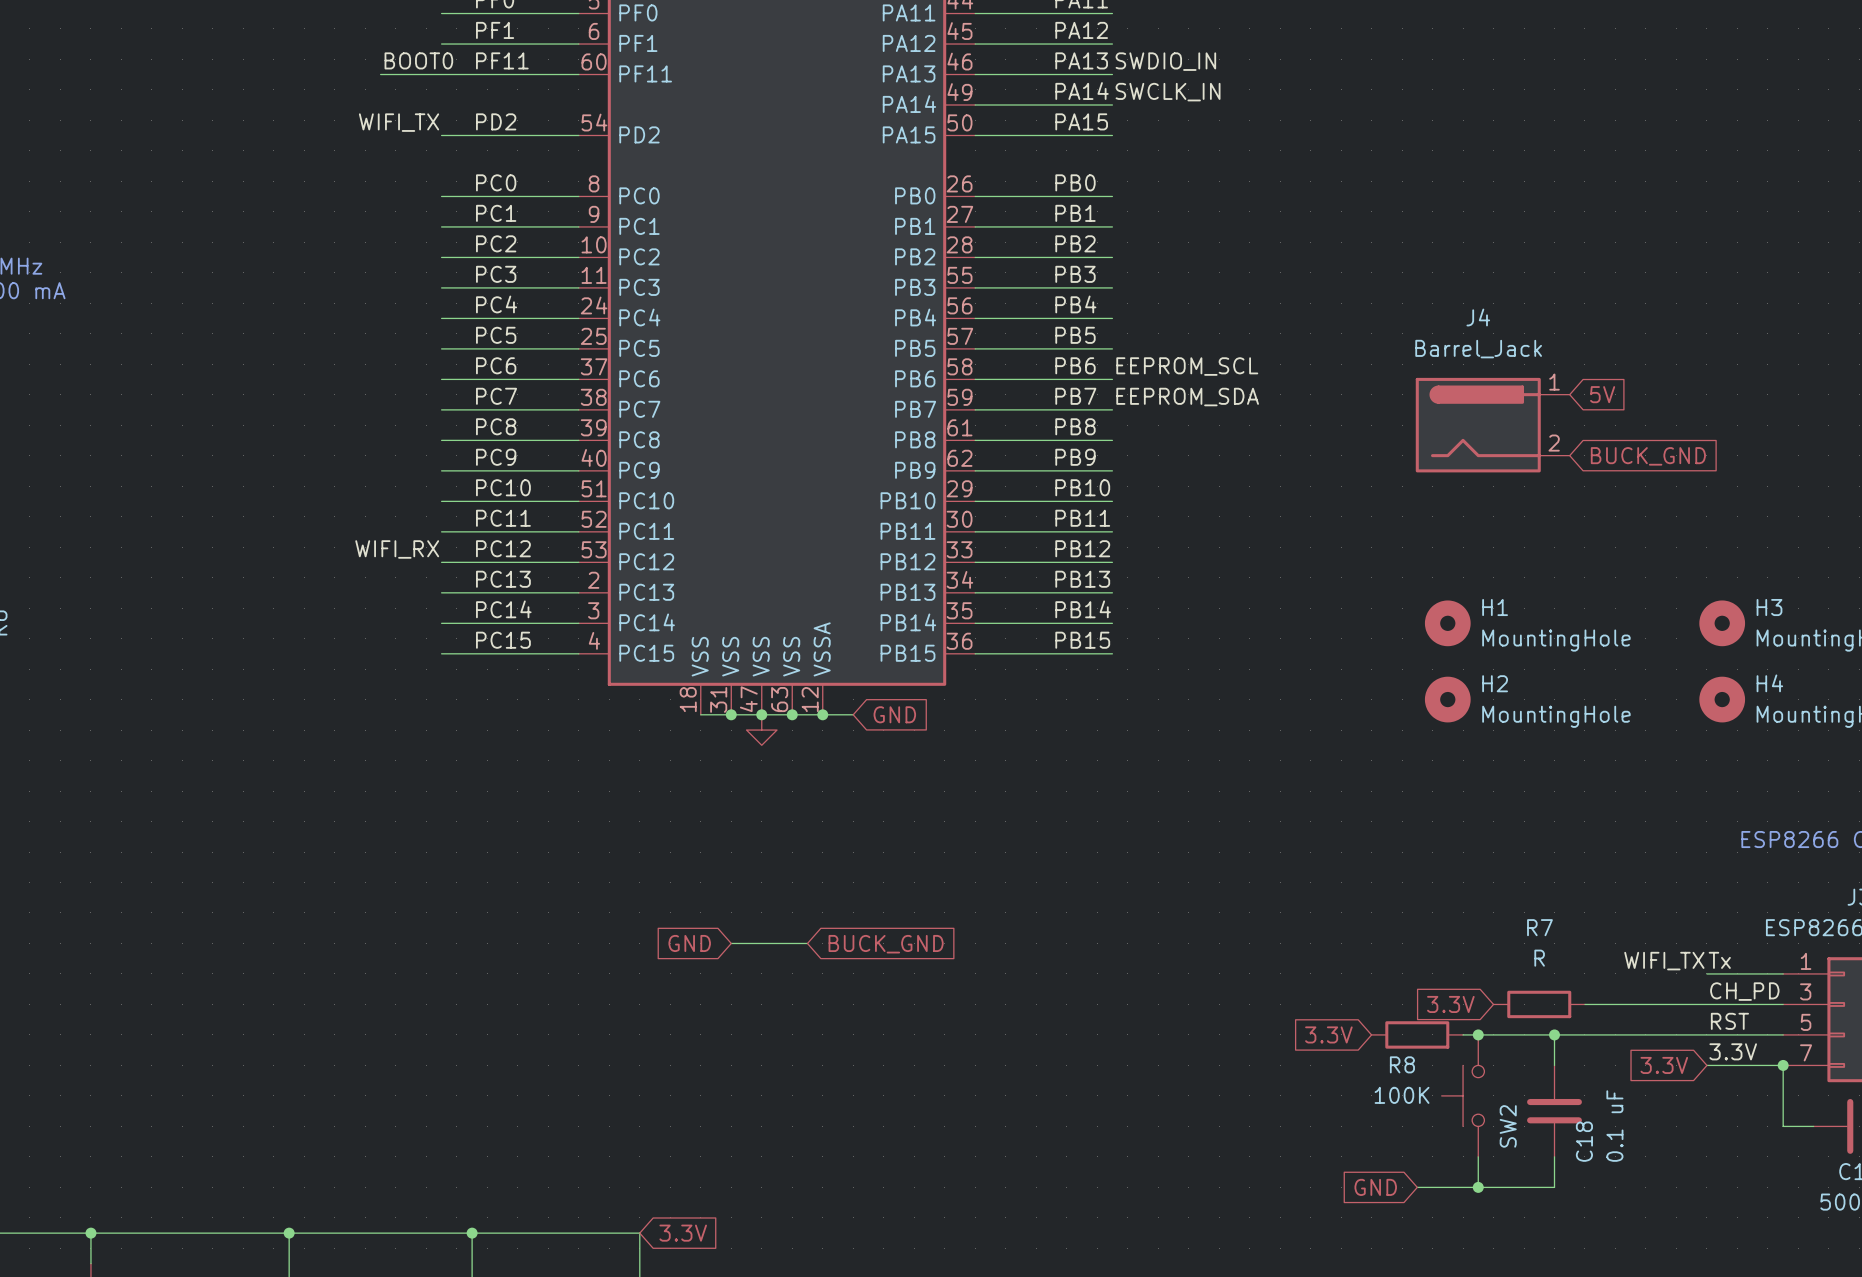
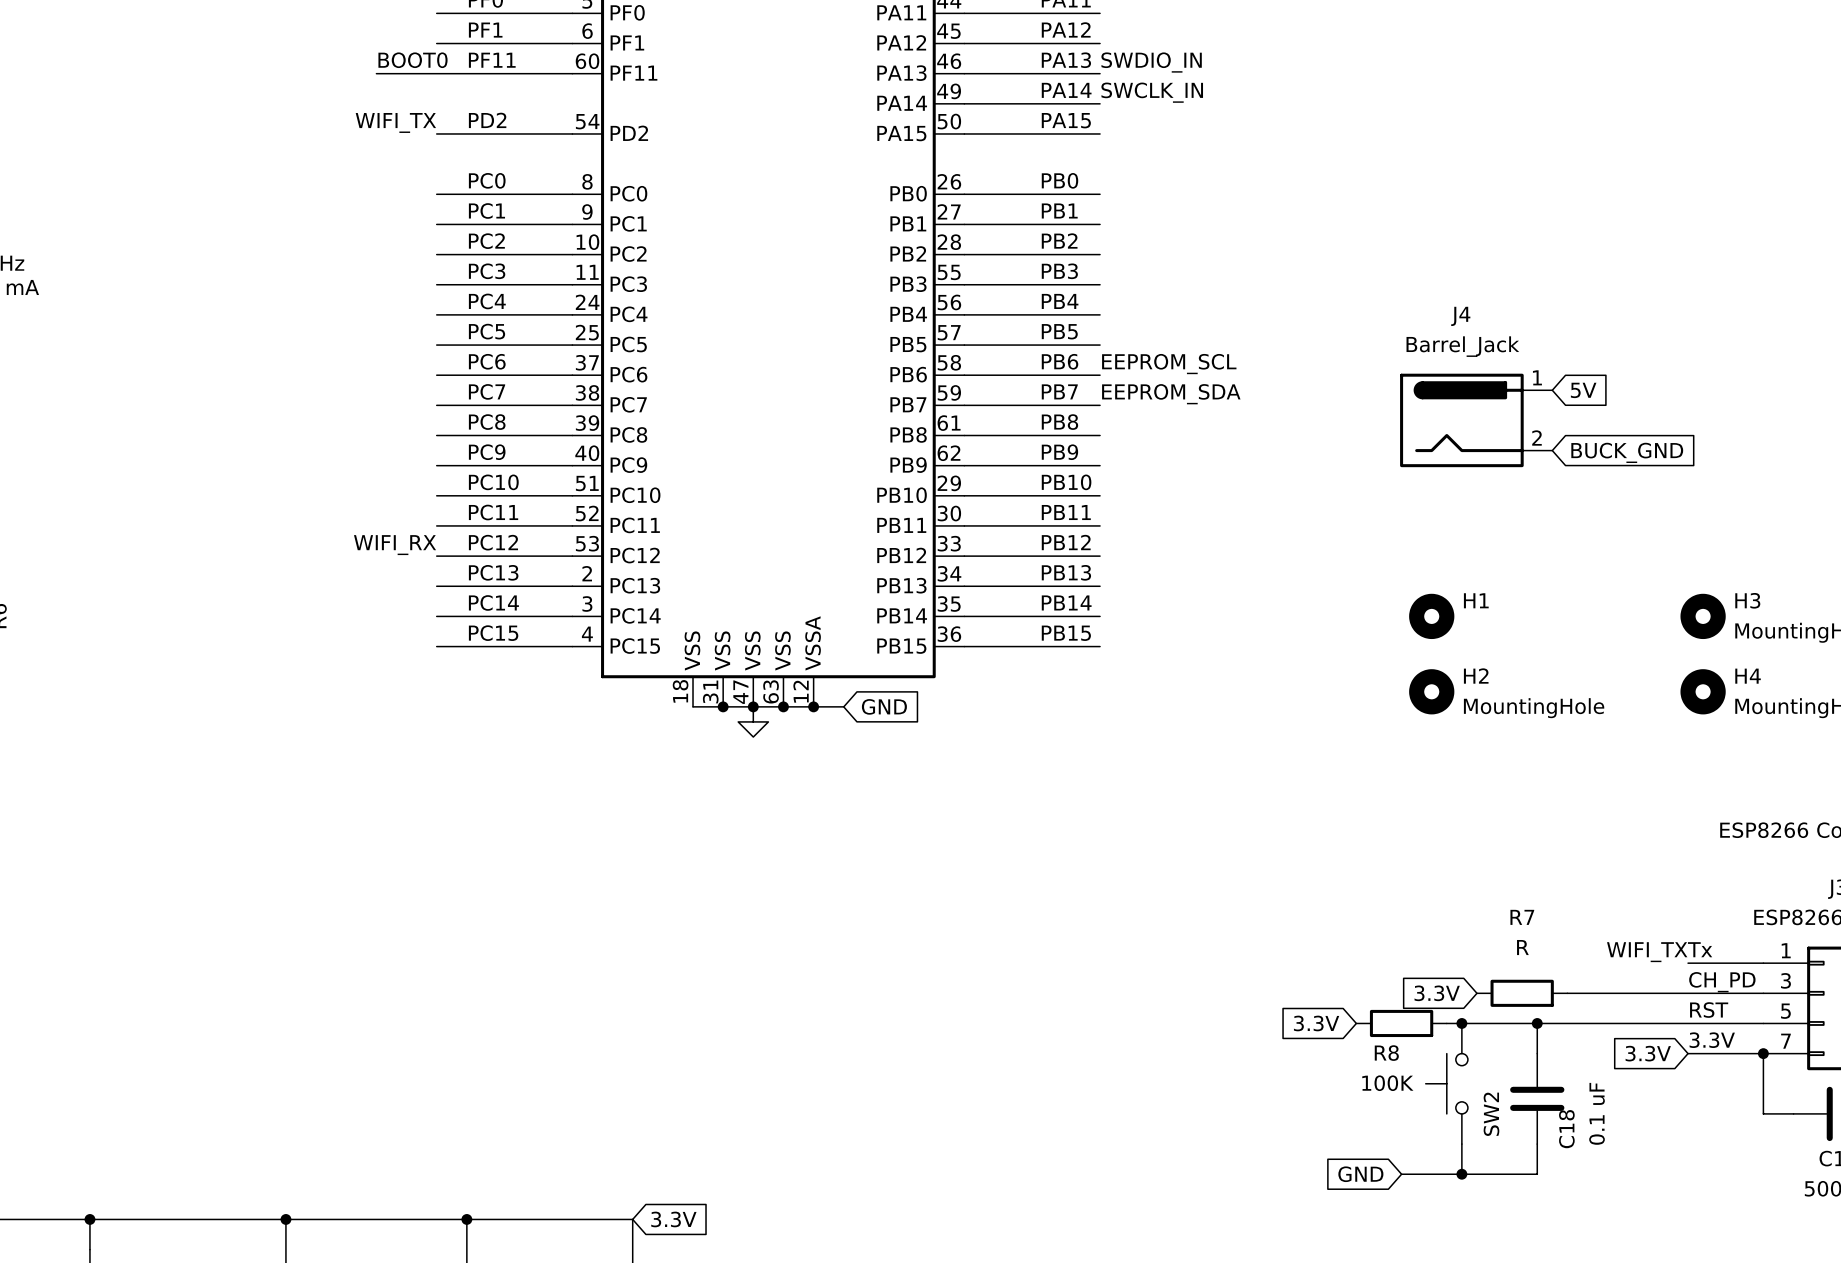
H1 value: MountingHole (1556, 640) -> none
global label: GND (689, 943) -> none
wire: (731, 943) (807, 943) -> none
global label: BUCK_GND (886, 944) -> none

